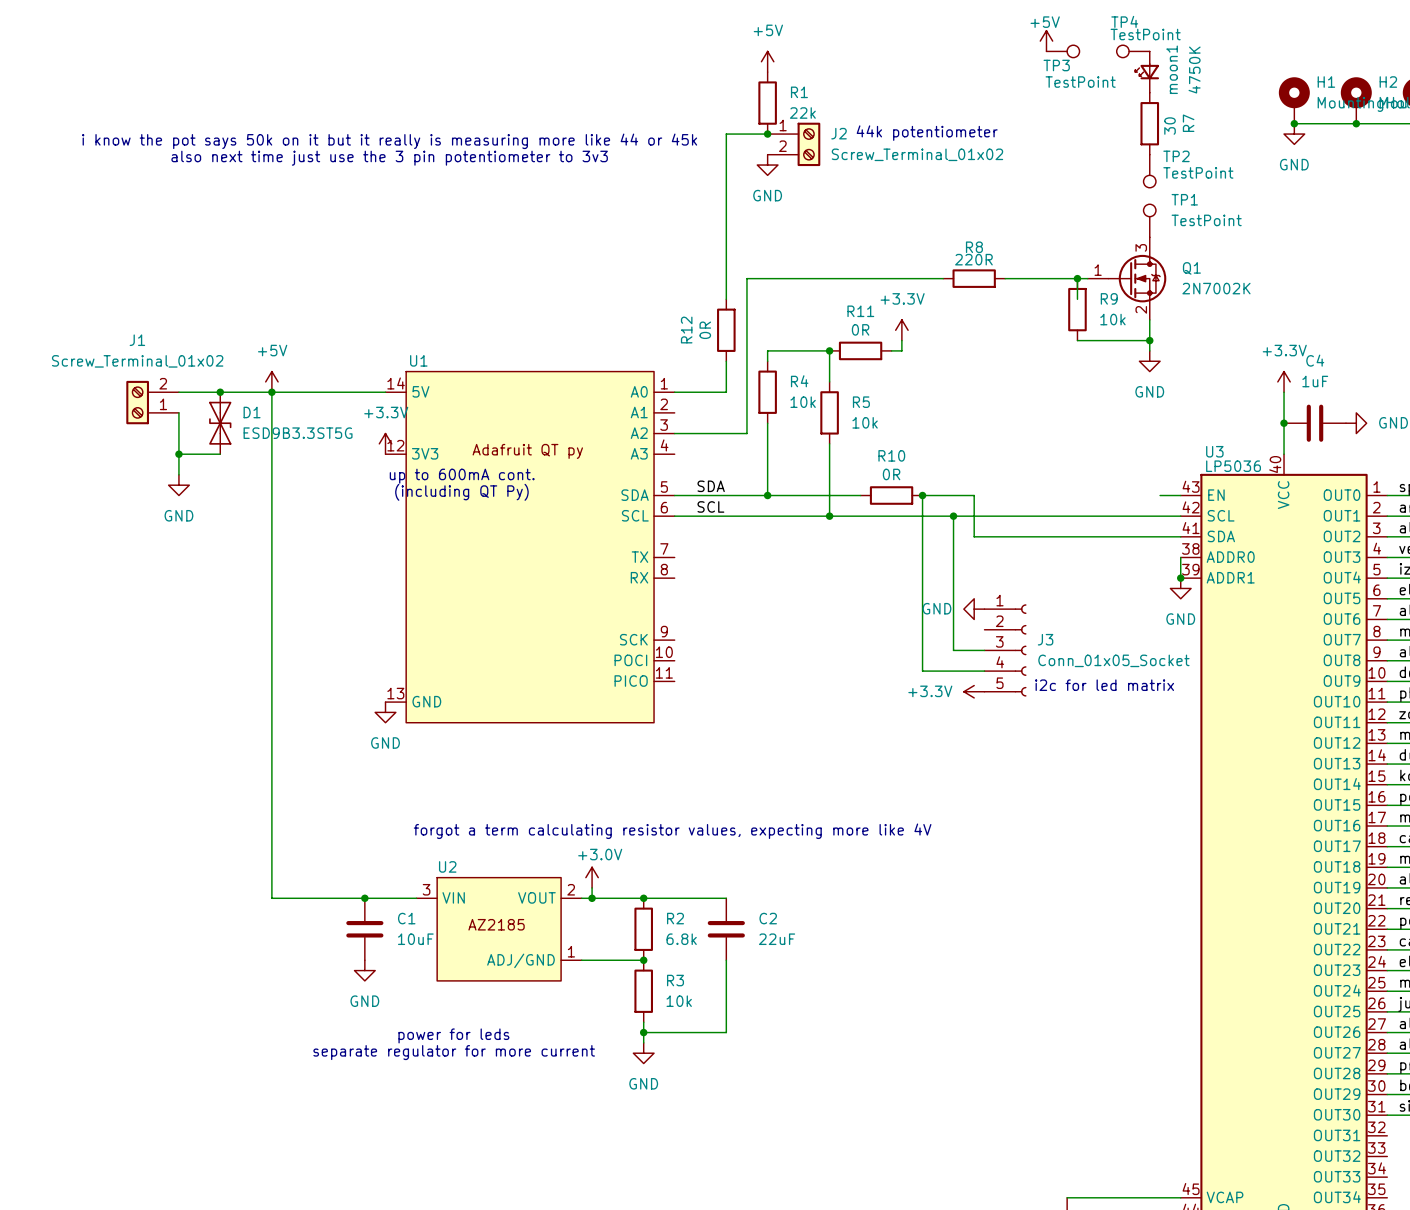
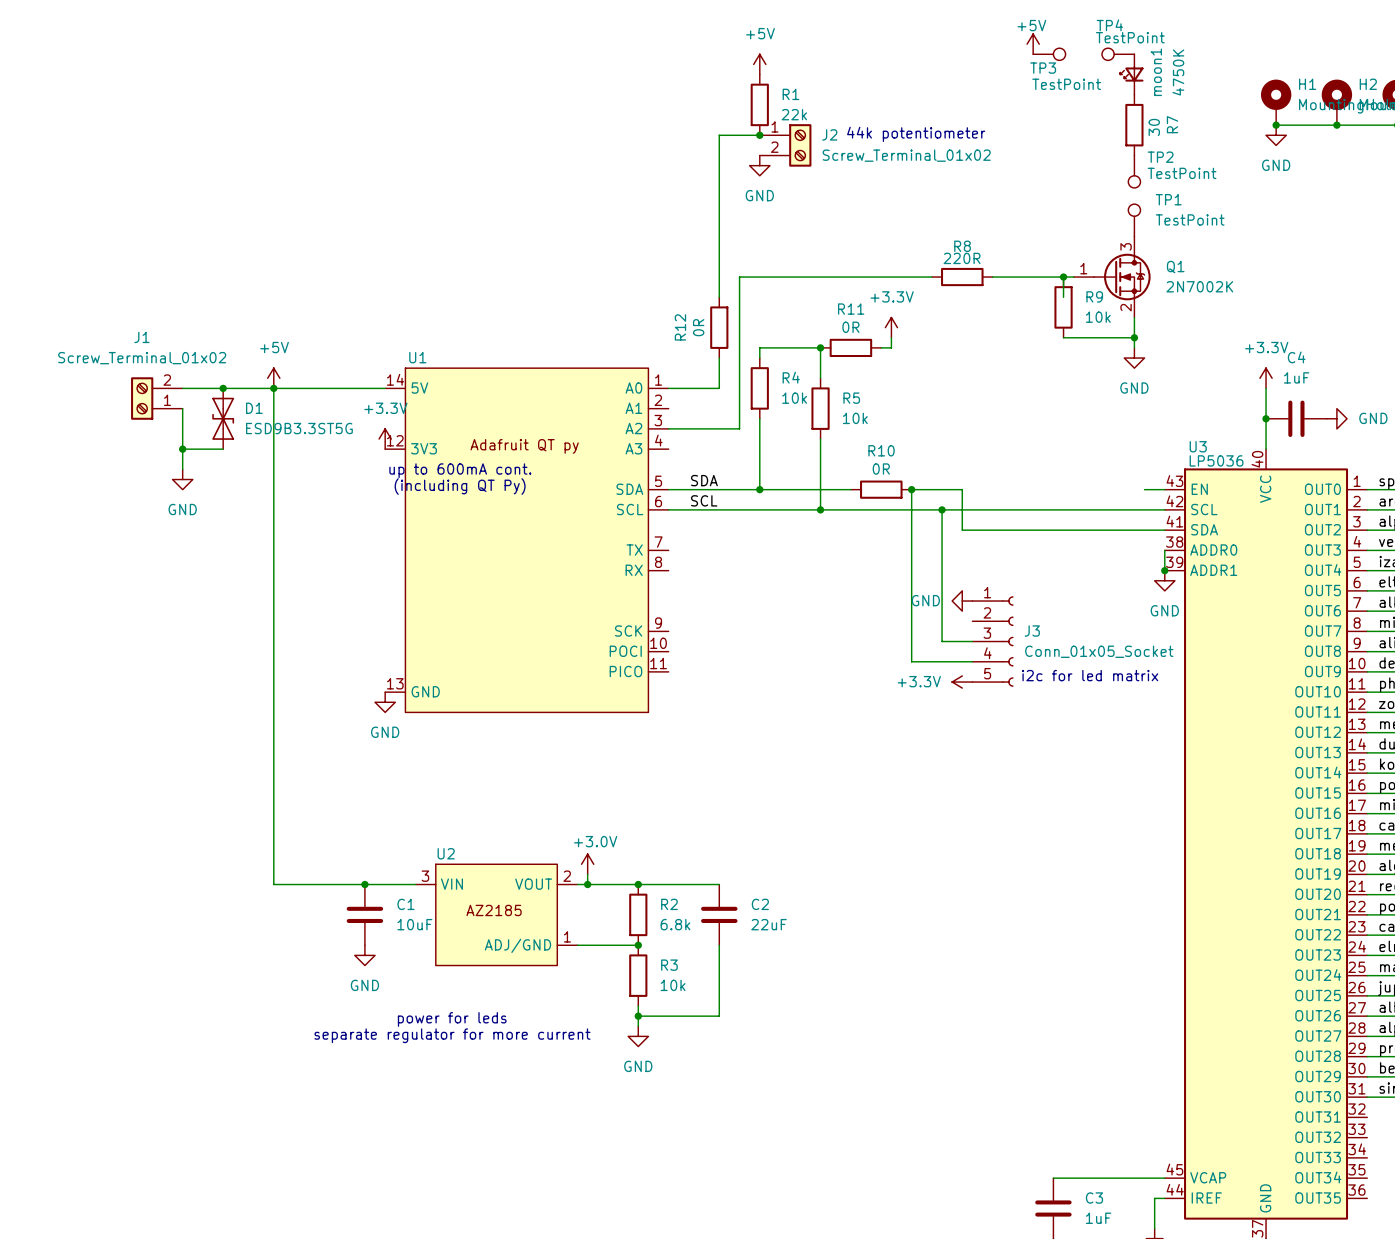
text: i know the pot says 50k on it but it really is measuring more like 44 or 45k (389, 141) -> none
text: also next time just use the 3 pin potentiometer to 3v3 (389, 158) -> none
text: forgot a term calculating resistor values, expecting more like 4V (672, 831) -> none

